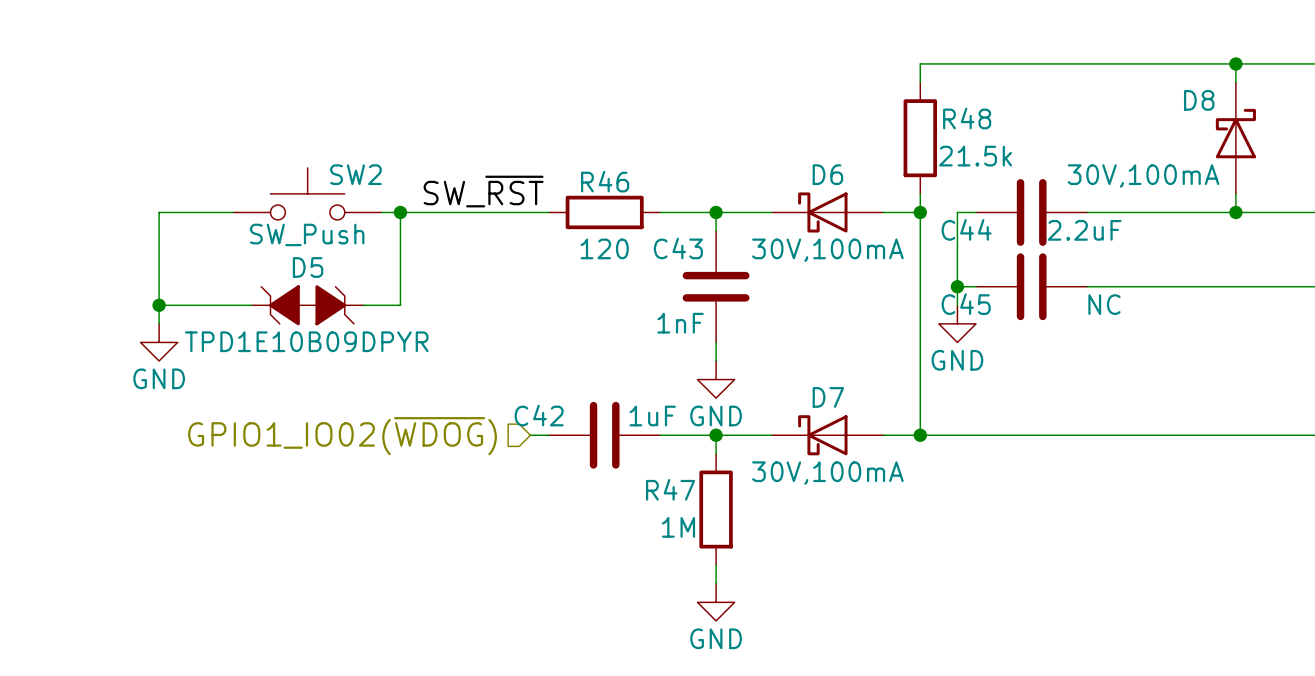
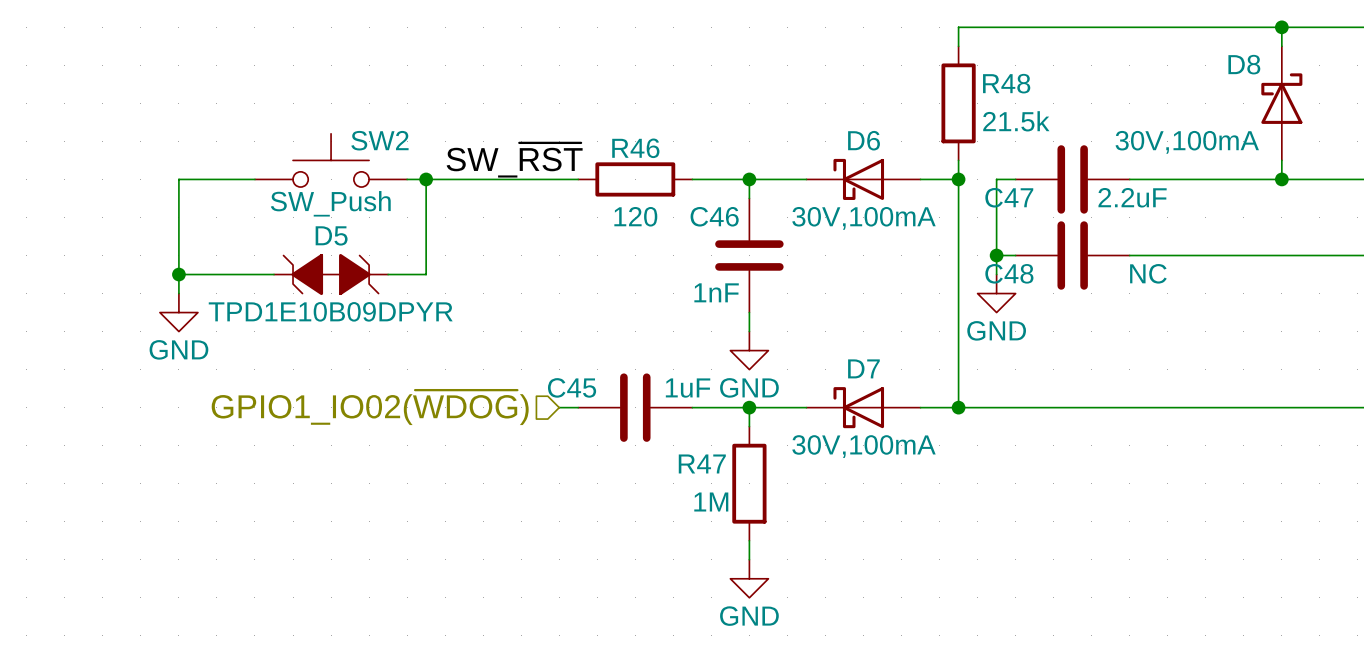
C44 name: C44 (966, 229) -> C47 (1009, 197)
C43 name: C43 (678, 248) -> C46 (714, 216)
C45 name: C45 (966, 304) -> C48 (1009, 273)
C42 name: C42 (539, 415) -> C45 (572, 387)

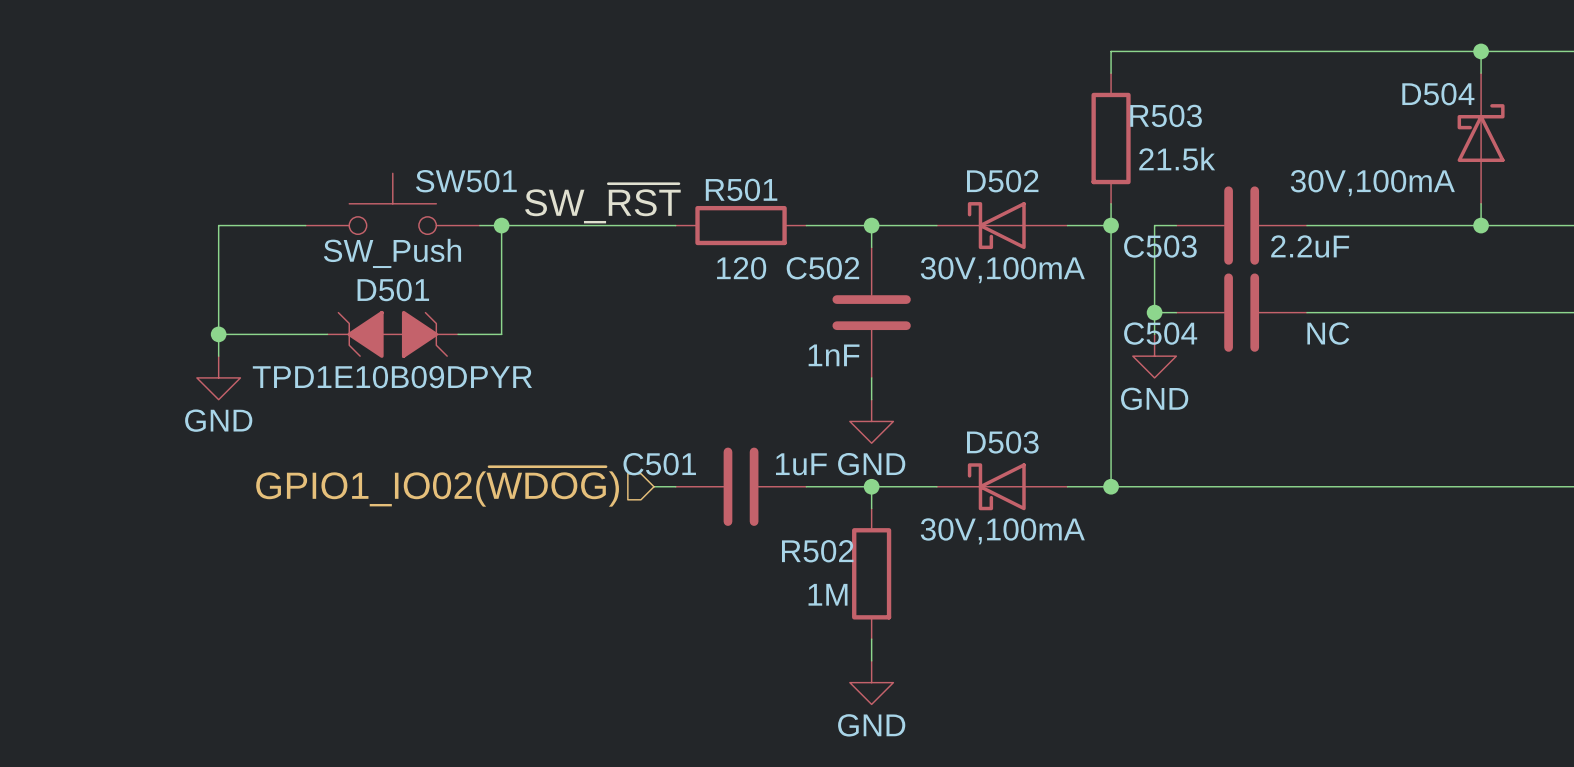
D8 name: D8 (1244, 64) -> D504 (1438, 94)
R48 name: R48 (1006, 83) -> R503 (1166, 115)
SW2 name: SW2 (379, 140) -> SW501 (466, 181)
D6 name: D6 (864, 140) -> D502 (1002, 181)
R46 name: R46 (635, 148) -> R501 (741, 189)
C47 name: C47 (1009, 197) -> C503 (1160, 246)
C46 name: C46 (714, 216) -> C502 (822, 268)
D5 name: D5 (331, 235) -> D501 (393, 290)
C48 name: C48 (1009, 273) -> C504 (1160, 333)
D7 name: D7 (863, 368) -> D503 (1002, 442)
C45 name: C45 (572, 387) -> C501 (659, 464)
R47 name: R47 (702, 463) -> R502 (817, 551)

